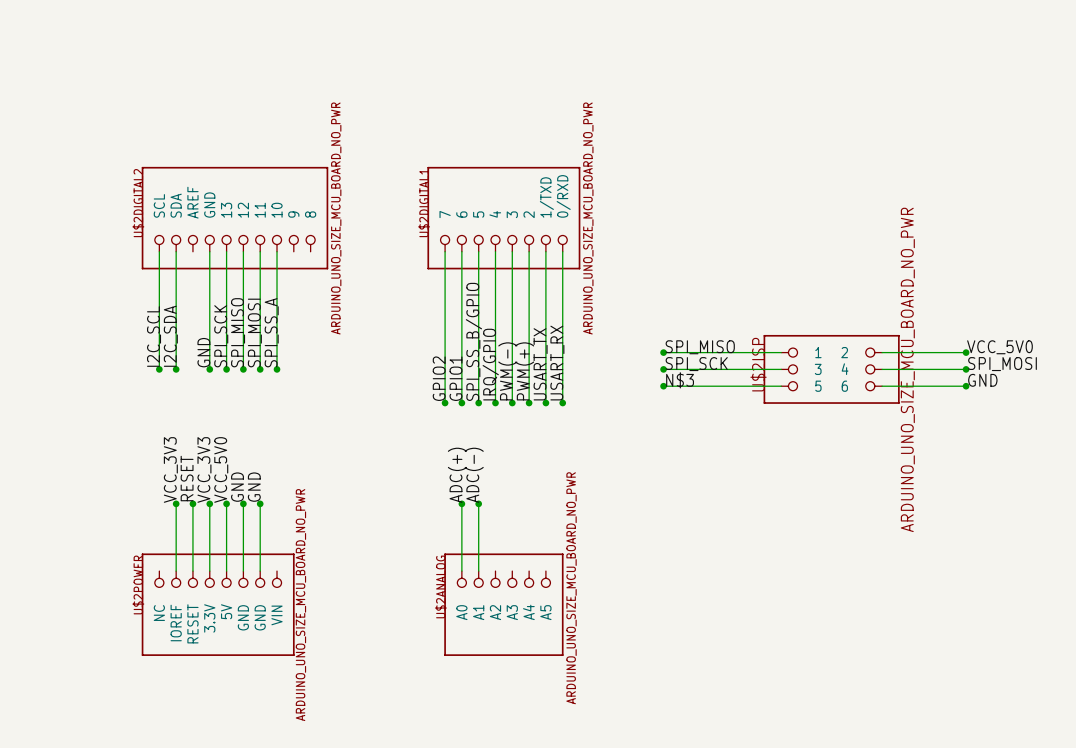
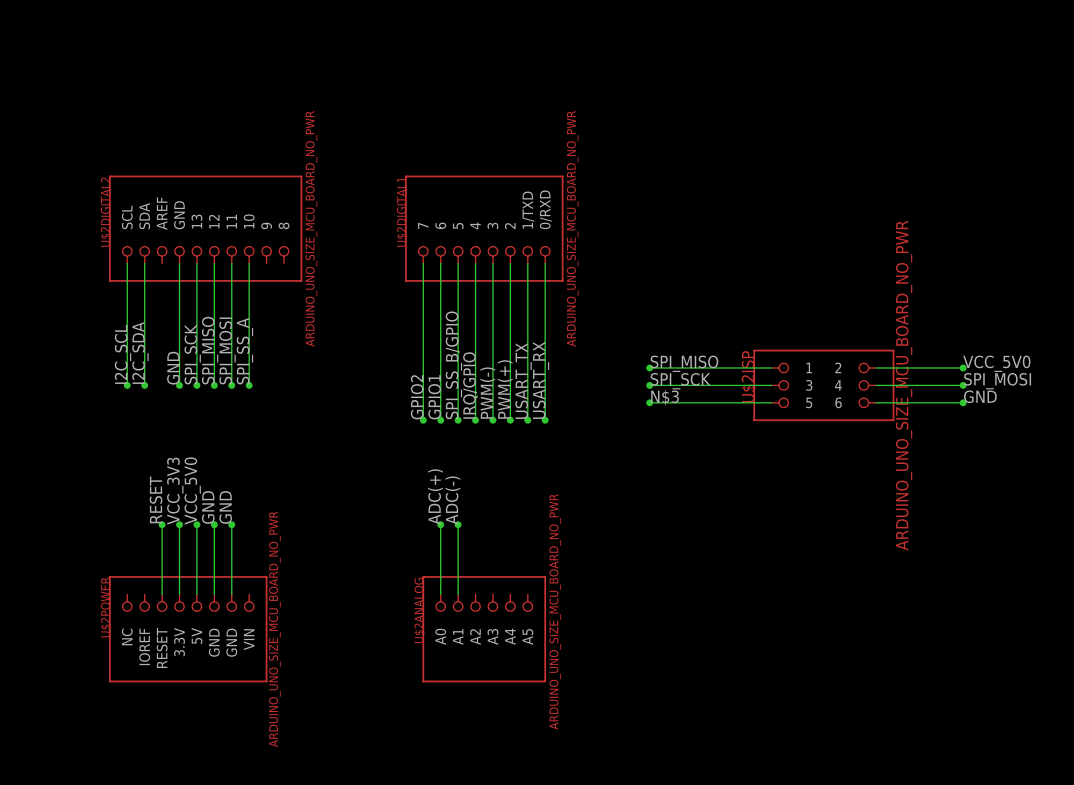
label: VCC_3V3 (170, 469) -> none
wire: (176, 503) (176, 571) -> none
junction: (176, 503) -> none

